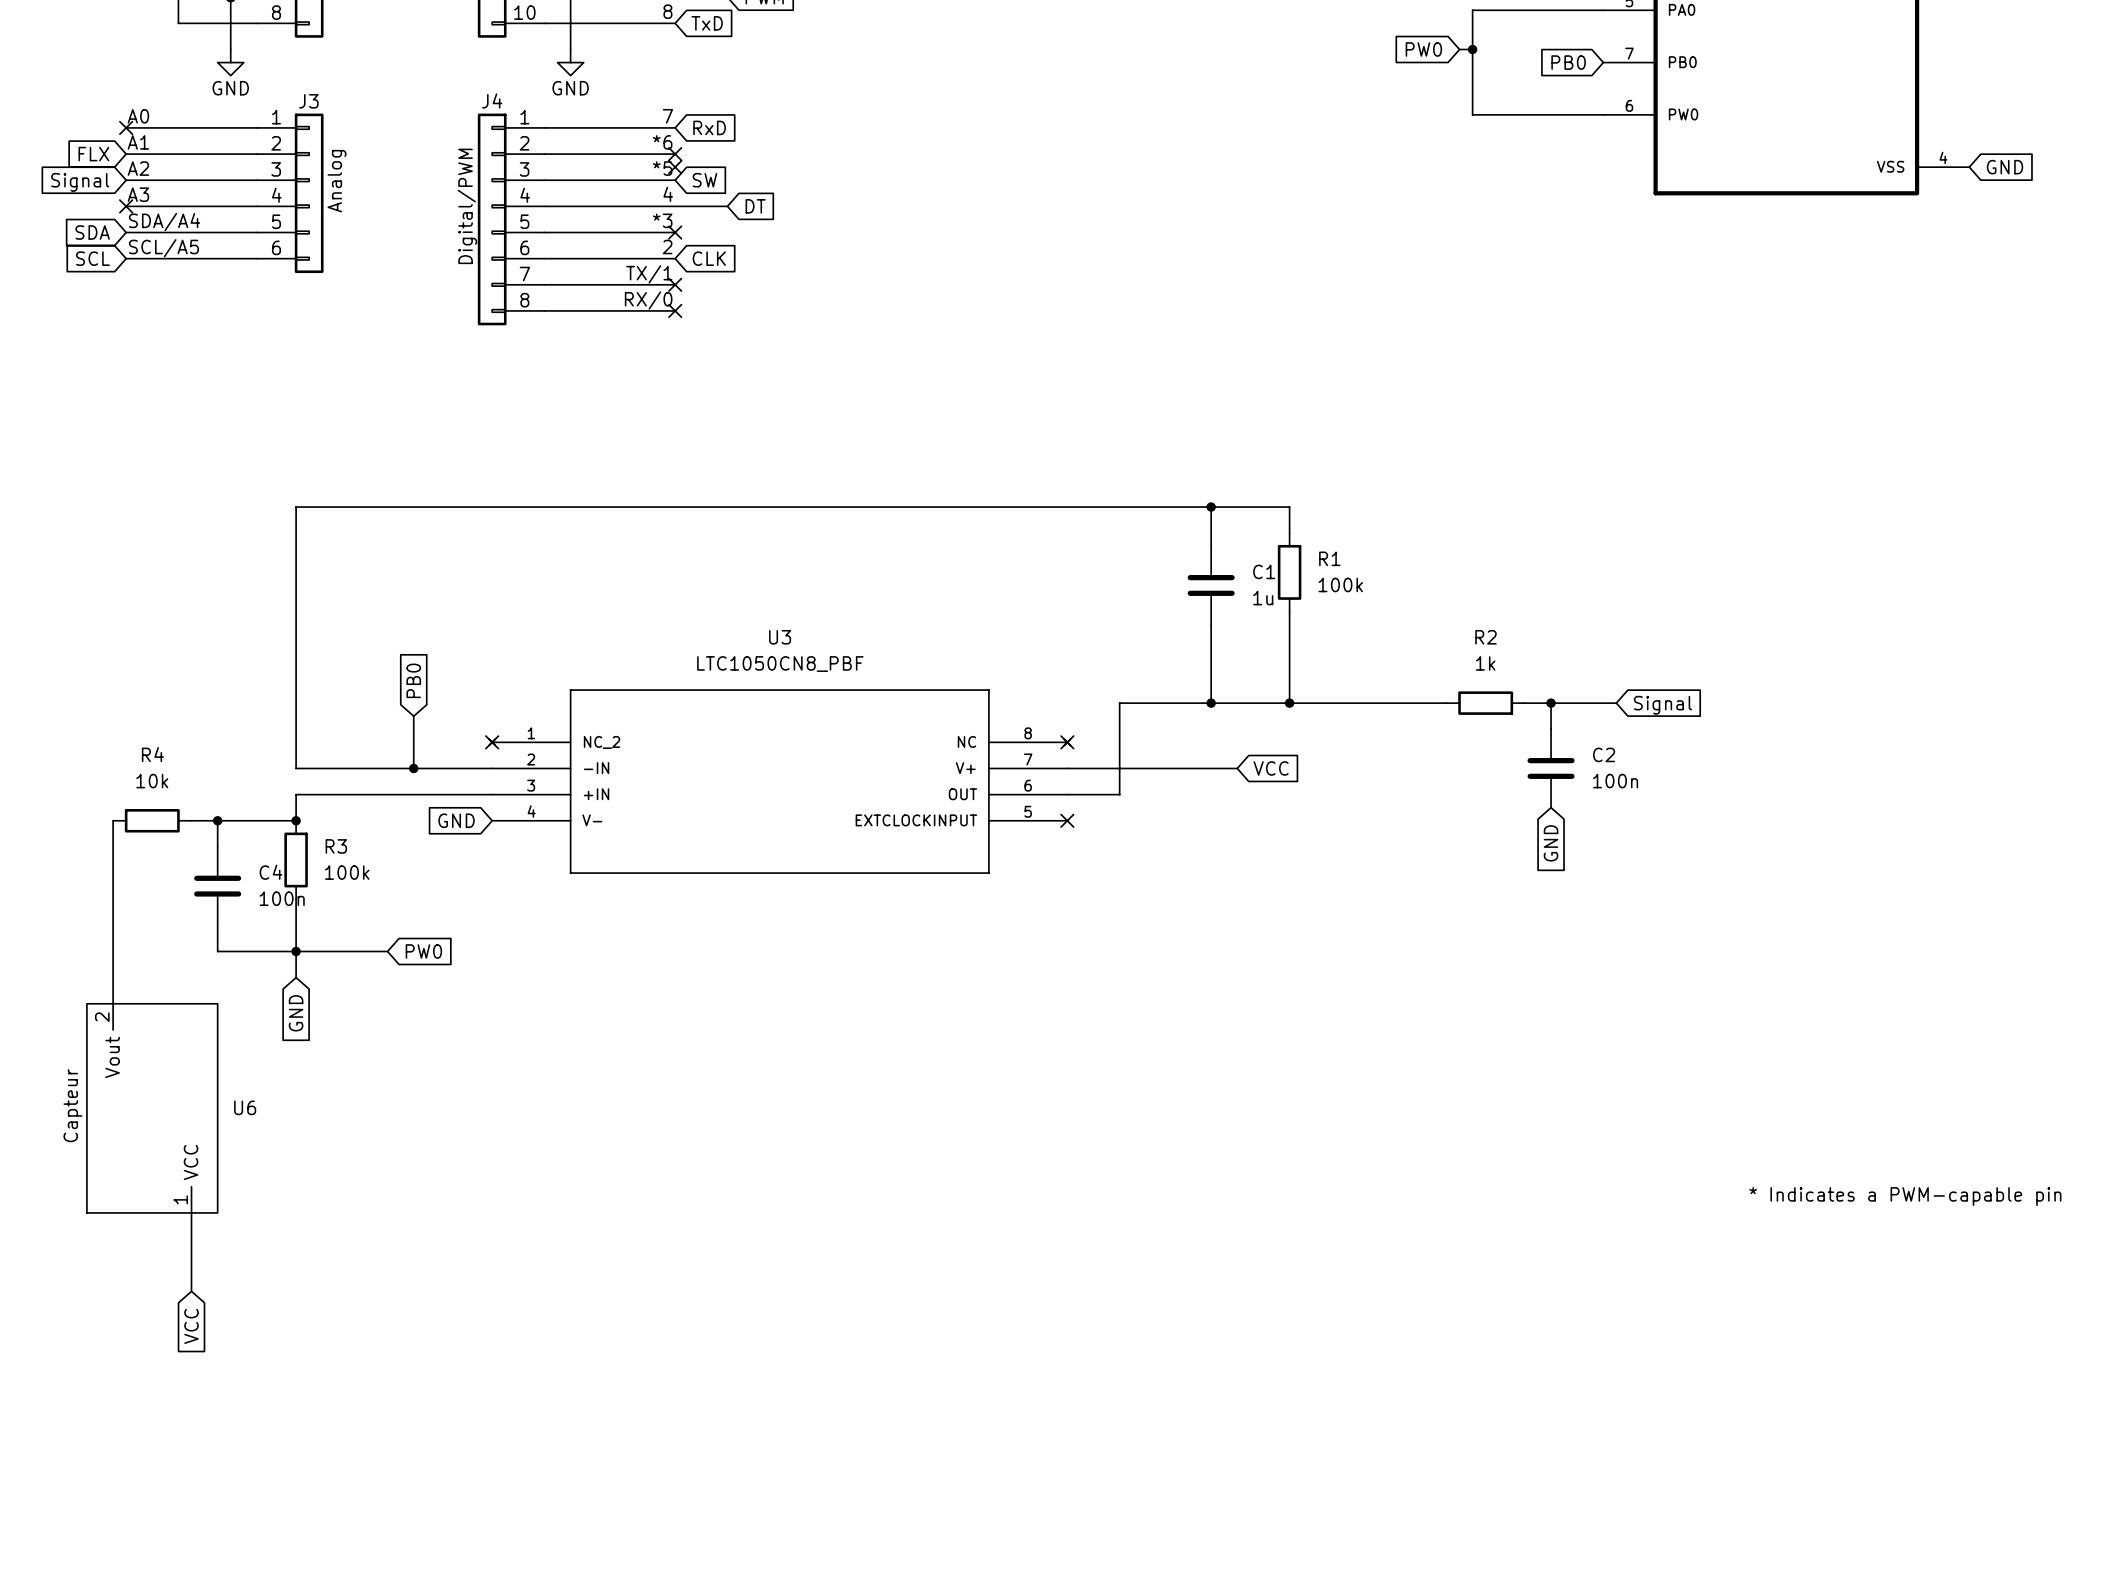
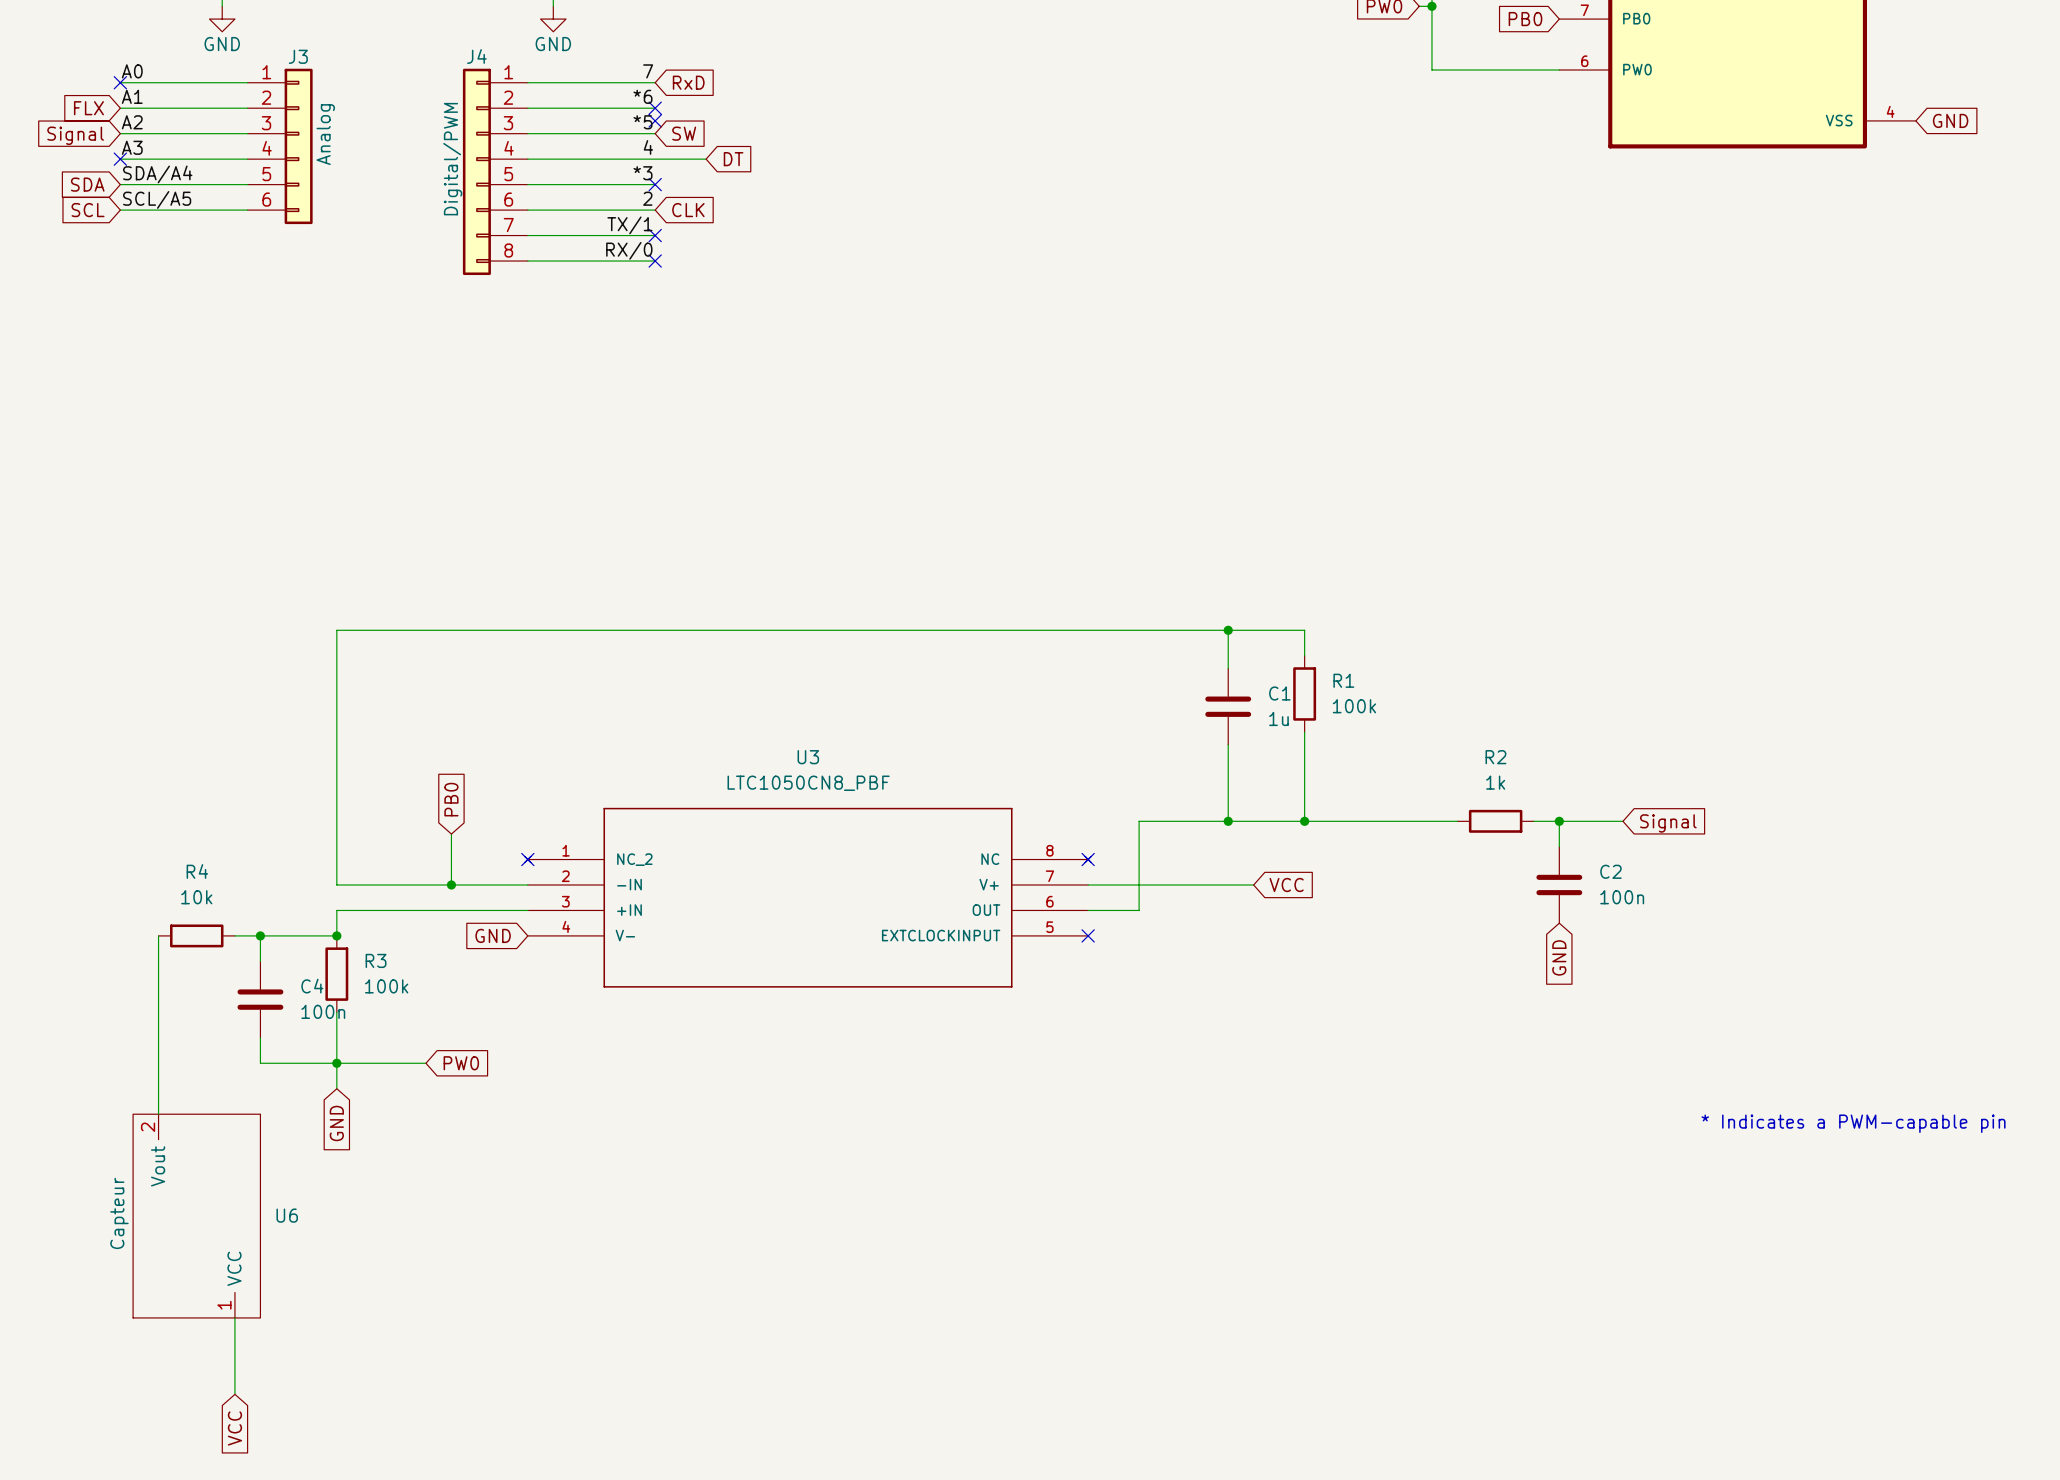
wire: (1211, 507) (1211, 546) -> (1228, 630) (1228, 668)
junction: (1211, 507) -> none
wire: (1289, 533) (1289, 507) (296, 507) (296, 768) (492, 768) -> none
R1 position: (1289, 572) -> (1304, 693)
C1 position: (1211, 585) -> (1228, 706)
wire: (1289, 611) (1289, 703) -> (1304, 732) (1304, 821)
wire: (1211, 624) (1211, 703) -> (1228, 744) (1228, 821)
global label position: PB0 (413, 680) -> PB0 (451, 799)
junction: none -> (1228, 630)
junction: (1211, 703) -> none
junction: (1289, 703) -> none
wire: (1446, 703) (1119, 703) (1119, 794) (1067, 794) -> (1457, 821) (1139, 821) (1139, 910) (1088, 910)
R2 position: (1485, 703) -> (1495, 821)
wire: (1524, 703) (1616, 703) -> (1533, 821) (1622, 821)
wire: (1551, 703) (1551, 729) -> (1559, 821) (1559, 846)
junction: (1551, 703) -> none
global label position: Signal (1662, 705) -> Signal (1668, 823)
wire: (413, 716) (413, 768) -> (451, 834) (451, 884)
no-connect mark: (492, 742) -> none
no-connect mark: (1067, 742) -> none
junction: (413, 768) -> none
wire: (1067, 768) (1237, 768) -> (1088, 884) (1253, 884)
global label position: VCC (1271, 768) -> VCC (1286, 884)
C2 position: (1551, 768) -> (1559, 884)
U3 position: (779, 781) -> (808, 897)
wire: (492, 794) (296, 794) (296, 820) (191, 820) -> (527, 910) (336, 910) (336, 935) (234, 935)
wire: (113, 820) (113, 1003) -> (158, 935) (158, 1114)
R4 position: (152, 820) -> (196, 935)
wire: (217, 820) (217, 846) -> (260, 935) (260, 961)
junction: (217, 820) -> none
junction: (296, 820) -> none
global label: GND (456, 820) -> none
no-connect mark: (1067, 820) -> none
global label position: GND (1551, 843) -> GND (1559, 957)
R3 position: (296, 859) -> (336, 974)
C4 position: (217, 886) -> (260, 999)
junction: none -> (1228, 821)
junction: none -> (1304, 821)
junction: none -> (1559, 821)
wire: (296, 899) (296, 977) -> (336, 1012) (336, 1088)
wire: (217, 925) (217, 951) (348, 951) -> (1304, 655) (1304, 630) (336, 630) (336, 884)
no-connect mark: none -> (527, 859)
no-connect mark: none -> (1088, 859)
junction: (296, 951) -> none
wire: none -> (375, 884) (527, 884)
global label position: PW0 (423, 951) -> PW0 (461, 1063)
junction: none -> (451, 884)
junction: none -> (260, 935)
junction: none -> (336, 935)
global label: none -> GND (493, 935)
no-connect mark: none -> (1088, 935)
global label: GND (296, 1013) -> none
U6 position: (152, 1108) -> (196, 1216)
wire: none -> (260, 1037) (260, 1063) (425, 1063)
junction: none -> (336, 1063)
global label: none -> GND (336, 1123)
wire: (191, 1212) (191, 1291) -> (234, 1317) (234, 1394)
global label position: VCC (191, 1326) -> VCC (234, 1428)

